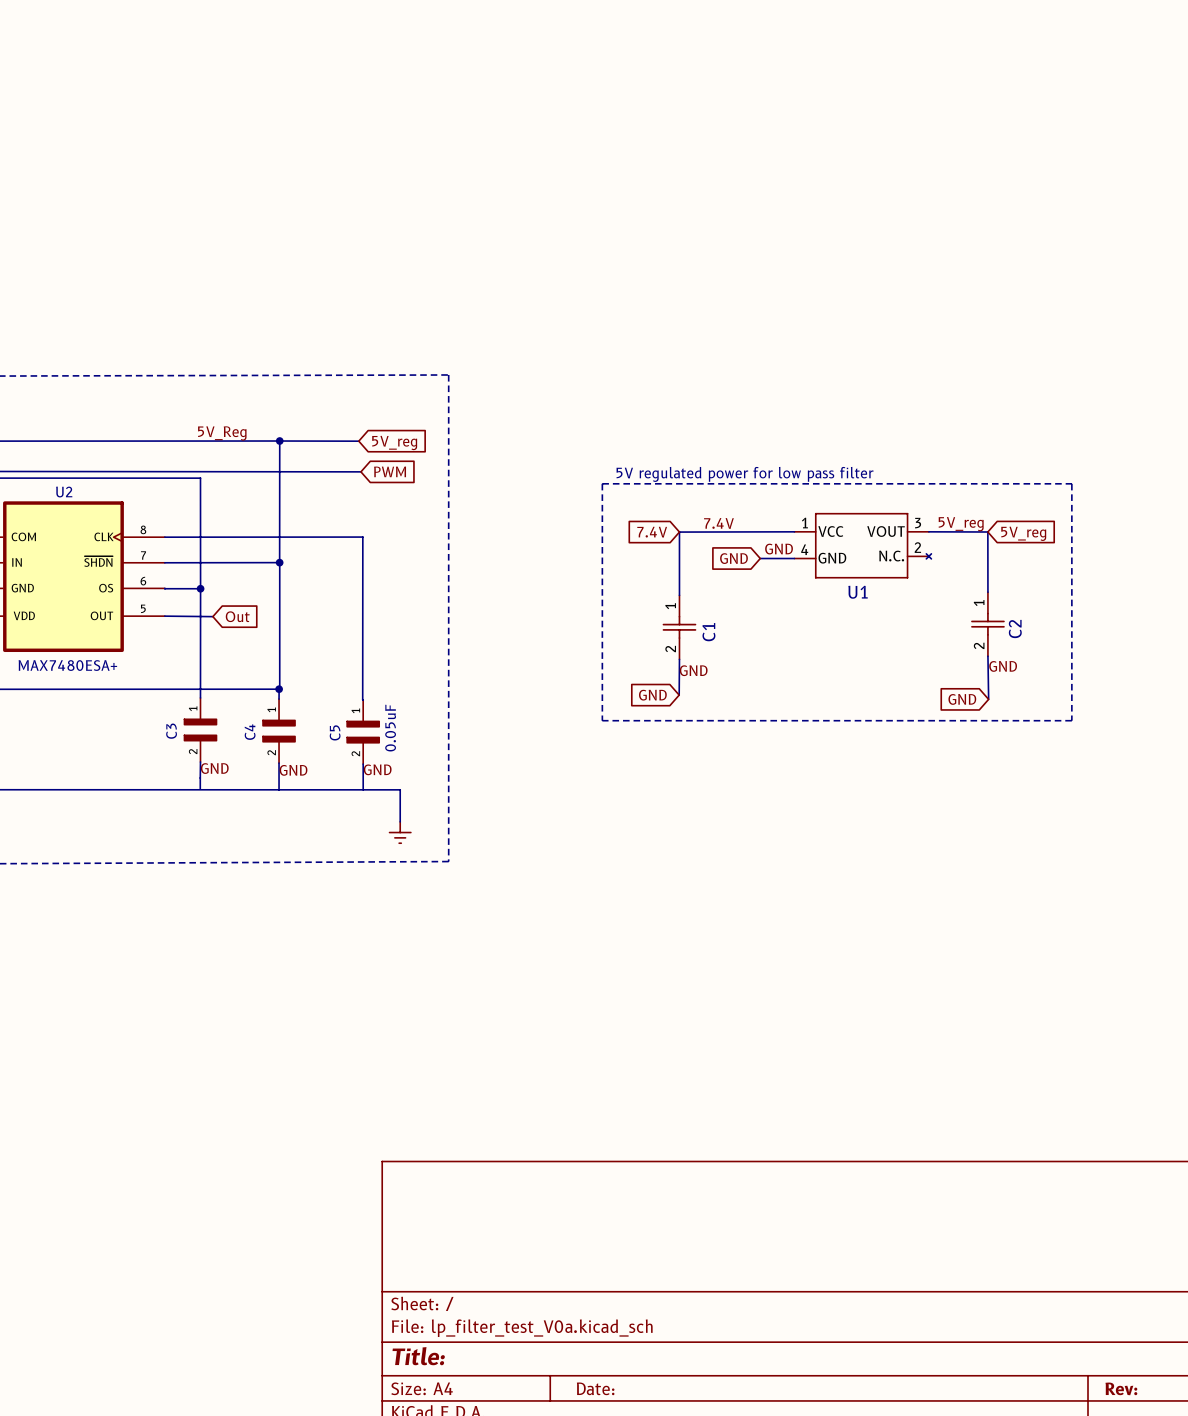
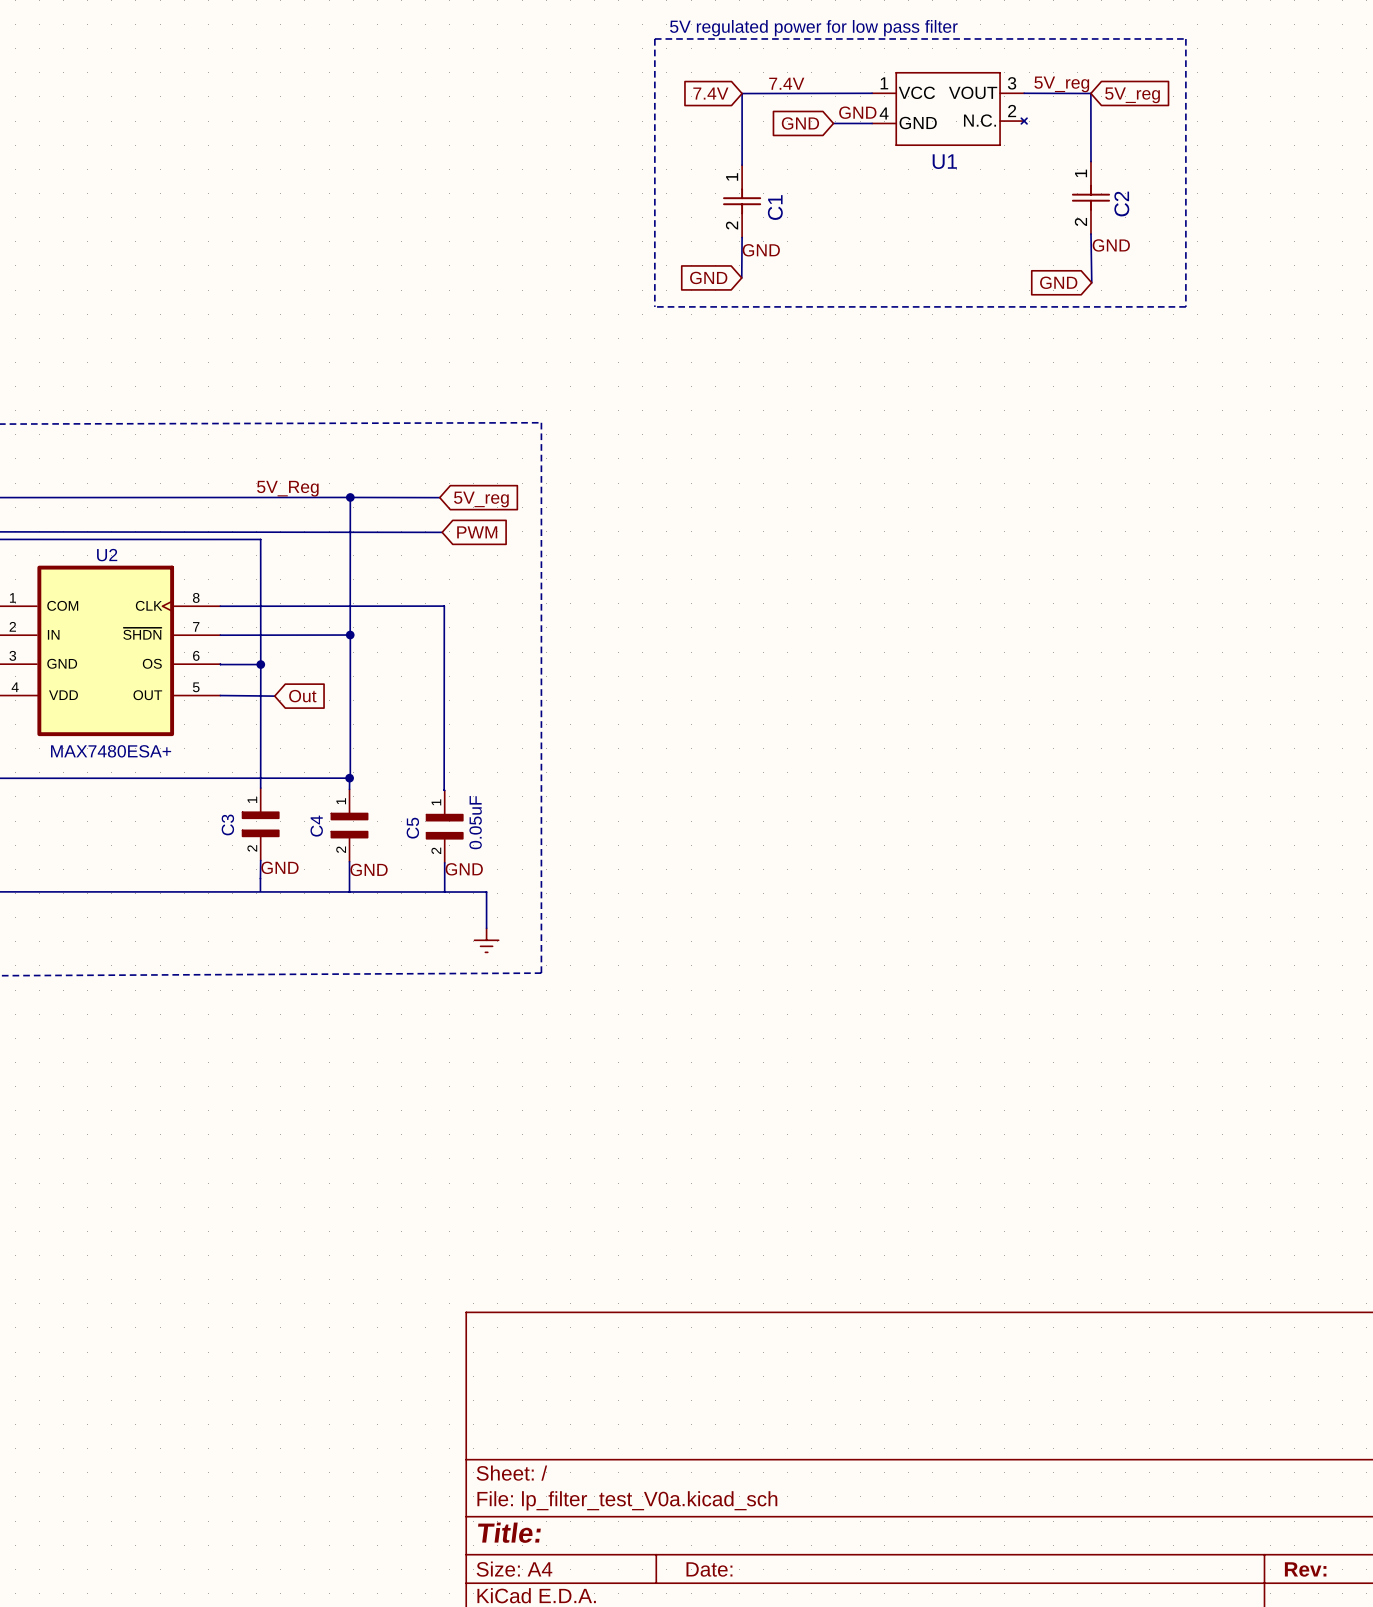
text: none -> 5V regulated power for low pass filter (813, 28)
line: none -> (654, 38) (654, 306) (1185, 306) (1185, 38) (654, 38)
label: none -> 7.4V (786, 83)
label: none -> 5V_reg (1061, 84)
global label: none -> 7.4V (710, 93)
wire: none -> (872, 93) (742, 93) (742, 165)
wire: none -> (1024, 93) (1090, 93) (1090, 161)
global label: none -> 5V_reg (1132, 95)
label: none -> GND (857, 112)
global label: none -> GND (800, 123)
wire: none -> (833, 123) (872, 123)
wire: none -> (1090, 234) (1091, 282)
wire: none -> (742, 237) (741, 277)
label: none -> GND (1111, 245)
label: none -> GND (761, 250)
global label: none -> GND (708, 277)
global label: none -> GND (1058, 282)
text: 5V regulated power for low pass filter (745, 474) -> none
line: (602, 483) (602, 720) (1071, 720) (1071, 483) (602, 483) -> none
label: 7.4V (718, 523) -> none
label: 5V_reg (961, 524) -> none
wire: (794, 531) (679, 532) (679, 595) -> none
wire: (928, 531) (987, 532) (987, 592) -> none
global label: 7.4V (652, 532) -> none
global label: 5V_reg (1023, 533) -> none
U1 position: (862, 545) -> (949, 108)
label: GND (779, 549) -> none
global label: GND (733, 558) -> none
wire: (760, 558) (794, 558) -> none
C2 position: (987, 624) -> (1090, 197)
C1 position: (679, 627) -> (742, 201)
wire: (987, 656) (988, 699) -> none
wire: (679, 659) (679, 695) -> none
label: GND (1003, 666) -> none
label: GND (693, 670) -> none
global label: GND (652, 695) -> none
global label: GND (962, 699) -> none

